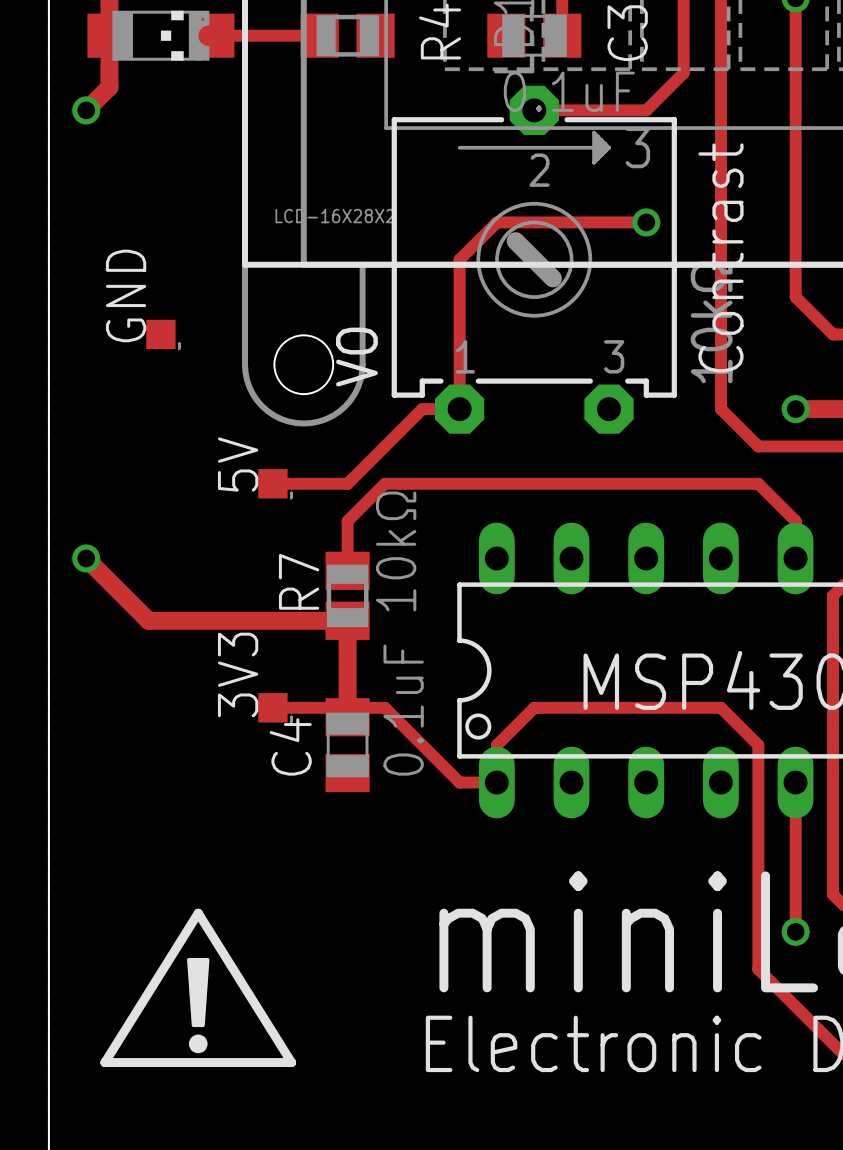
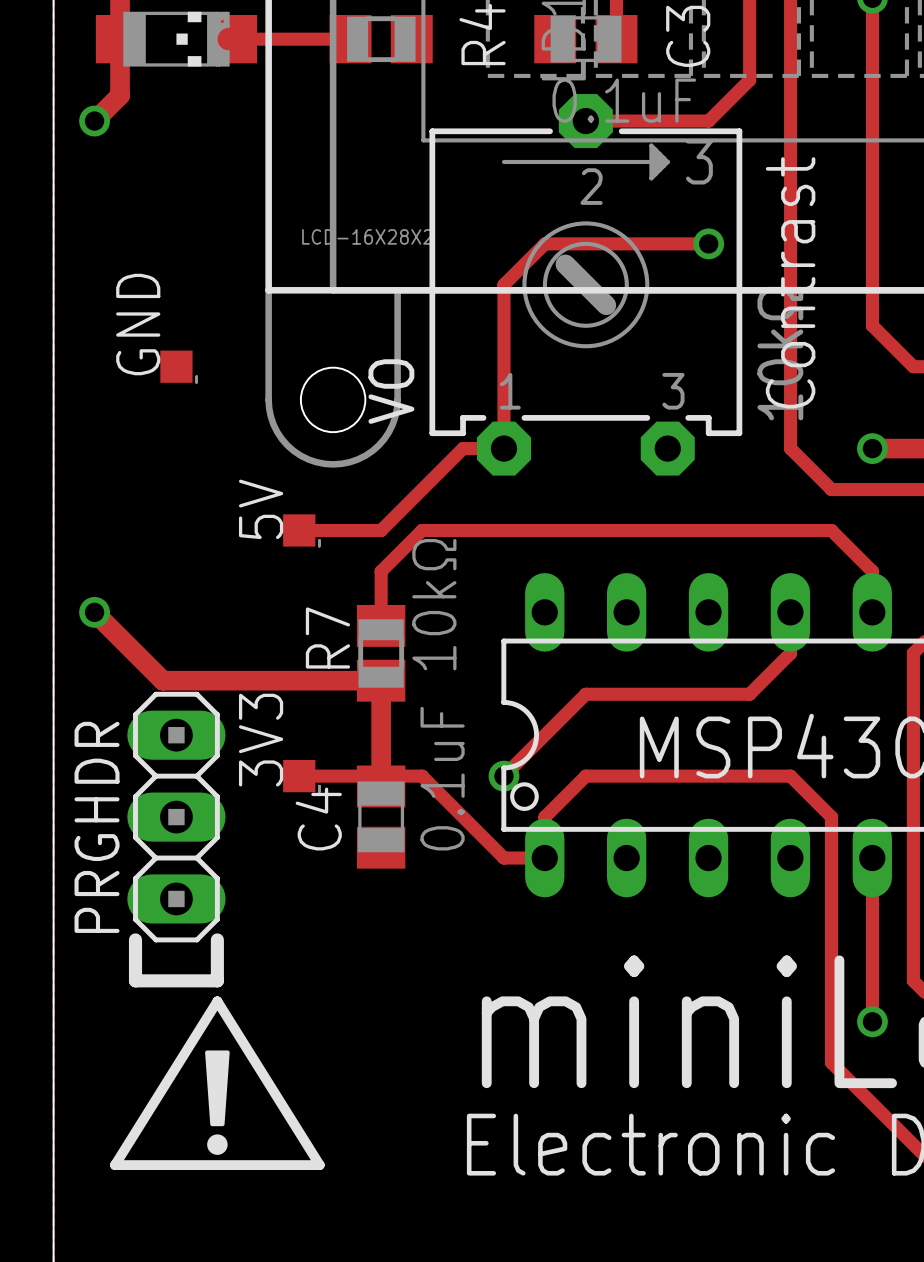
track: none -> (790, 612) (790, 653) (749, 694) (585, 694) (503, 776)
via: none -> (503, 776)
PRGHDR: none -> (176, 817)
line: none -> (135, 939) (135, 980) (217, 980) (217, 939)

